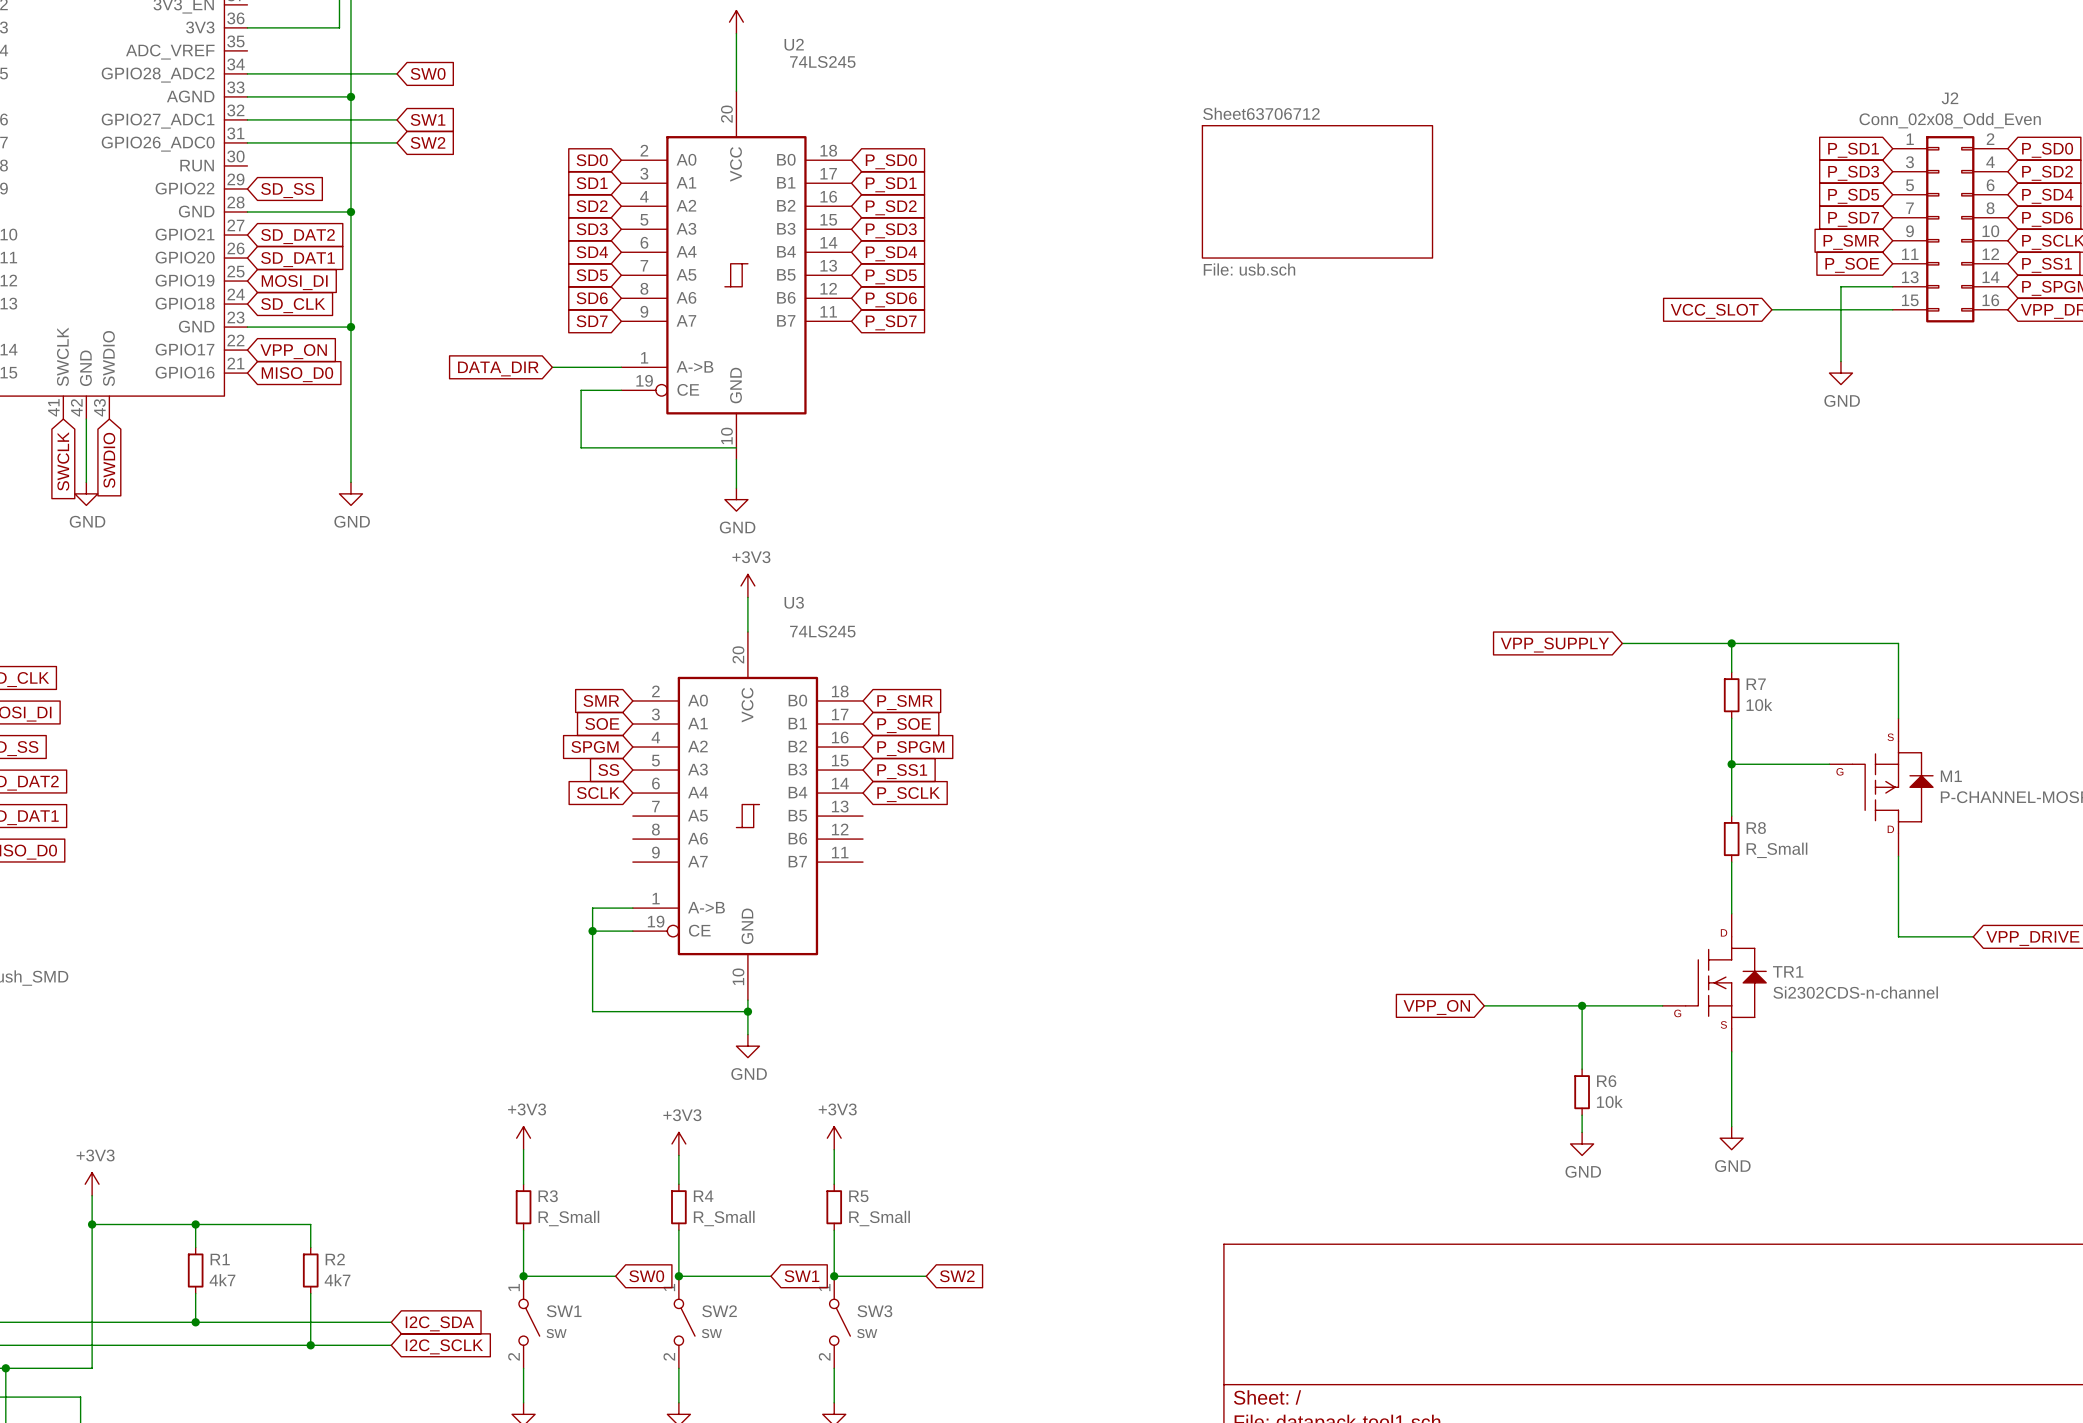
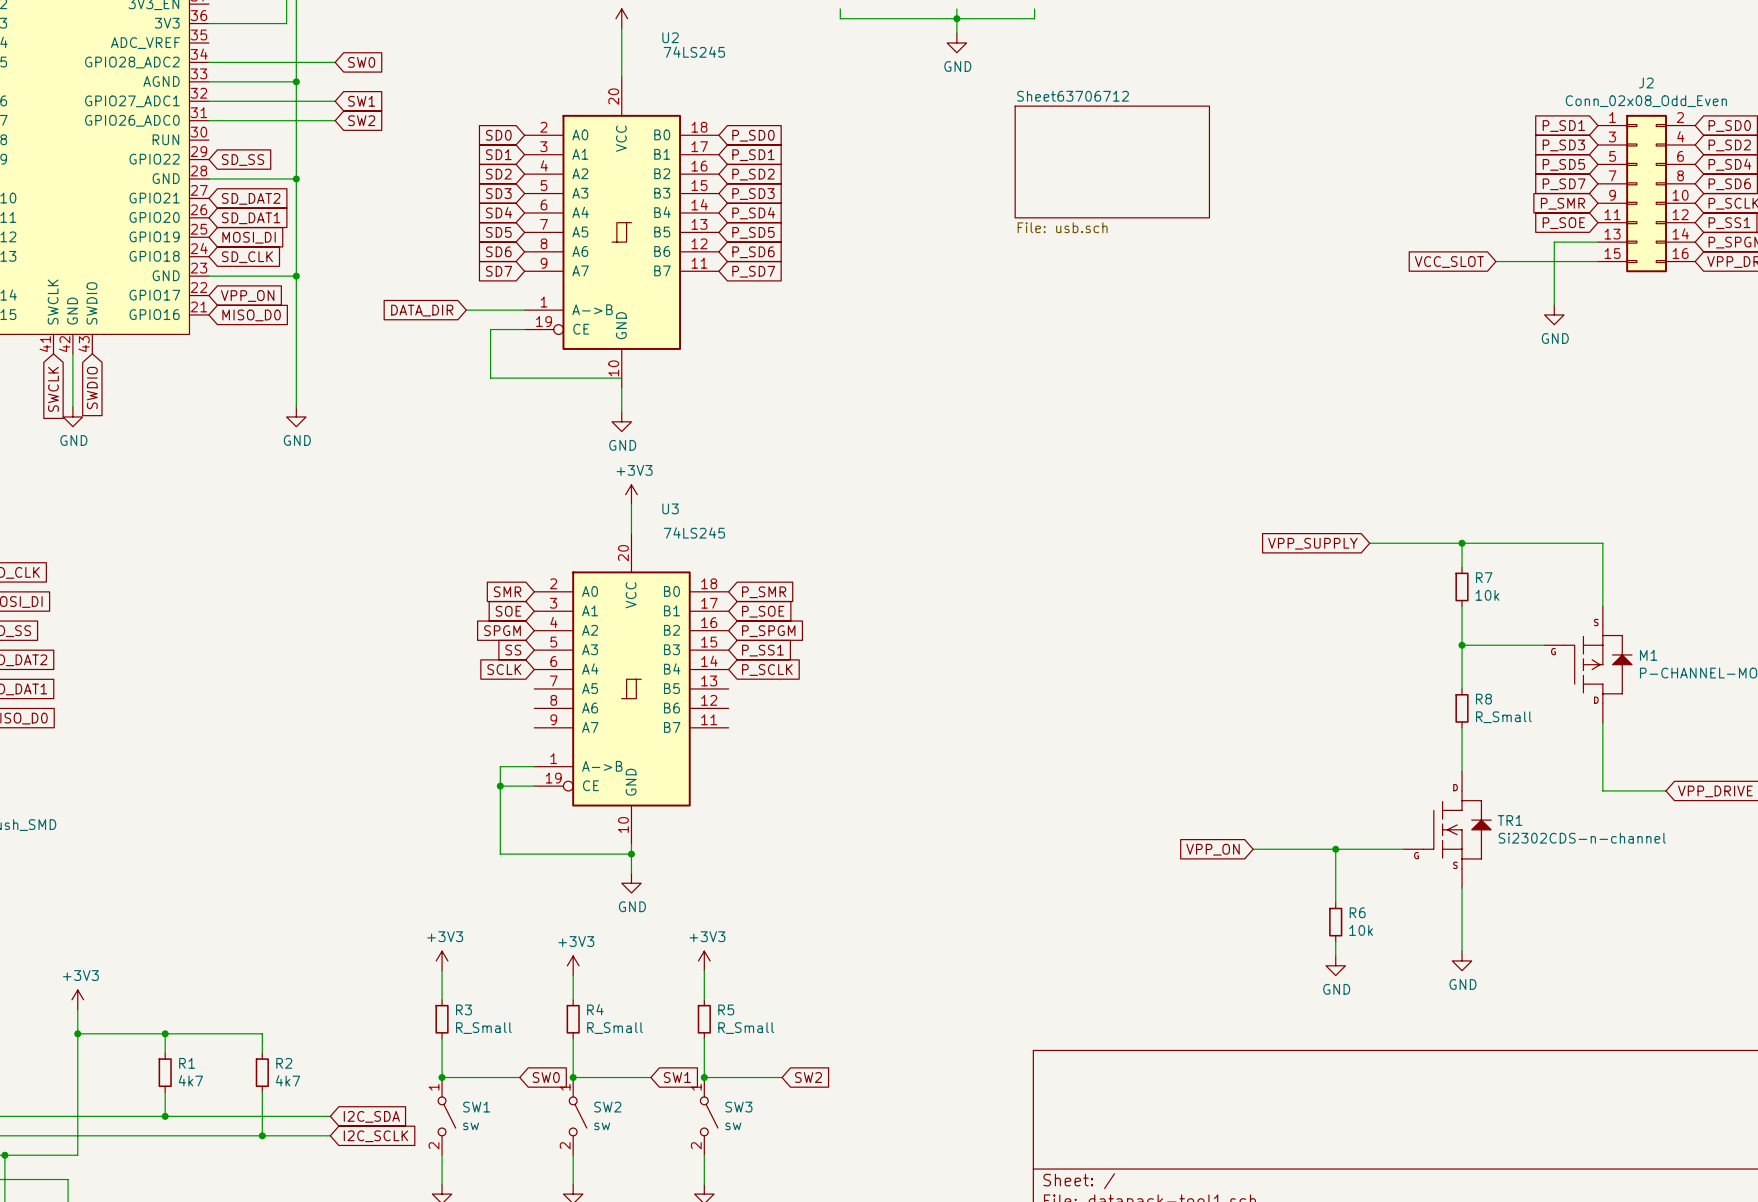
wire: none -> (840, 8) (840, 18) (1034, 18) (1034, 8)
wire: none -> (956, 8) (956, 33)
junction: none -> (956, 18)
power symbol: none -> GND (956, 42)

